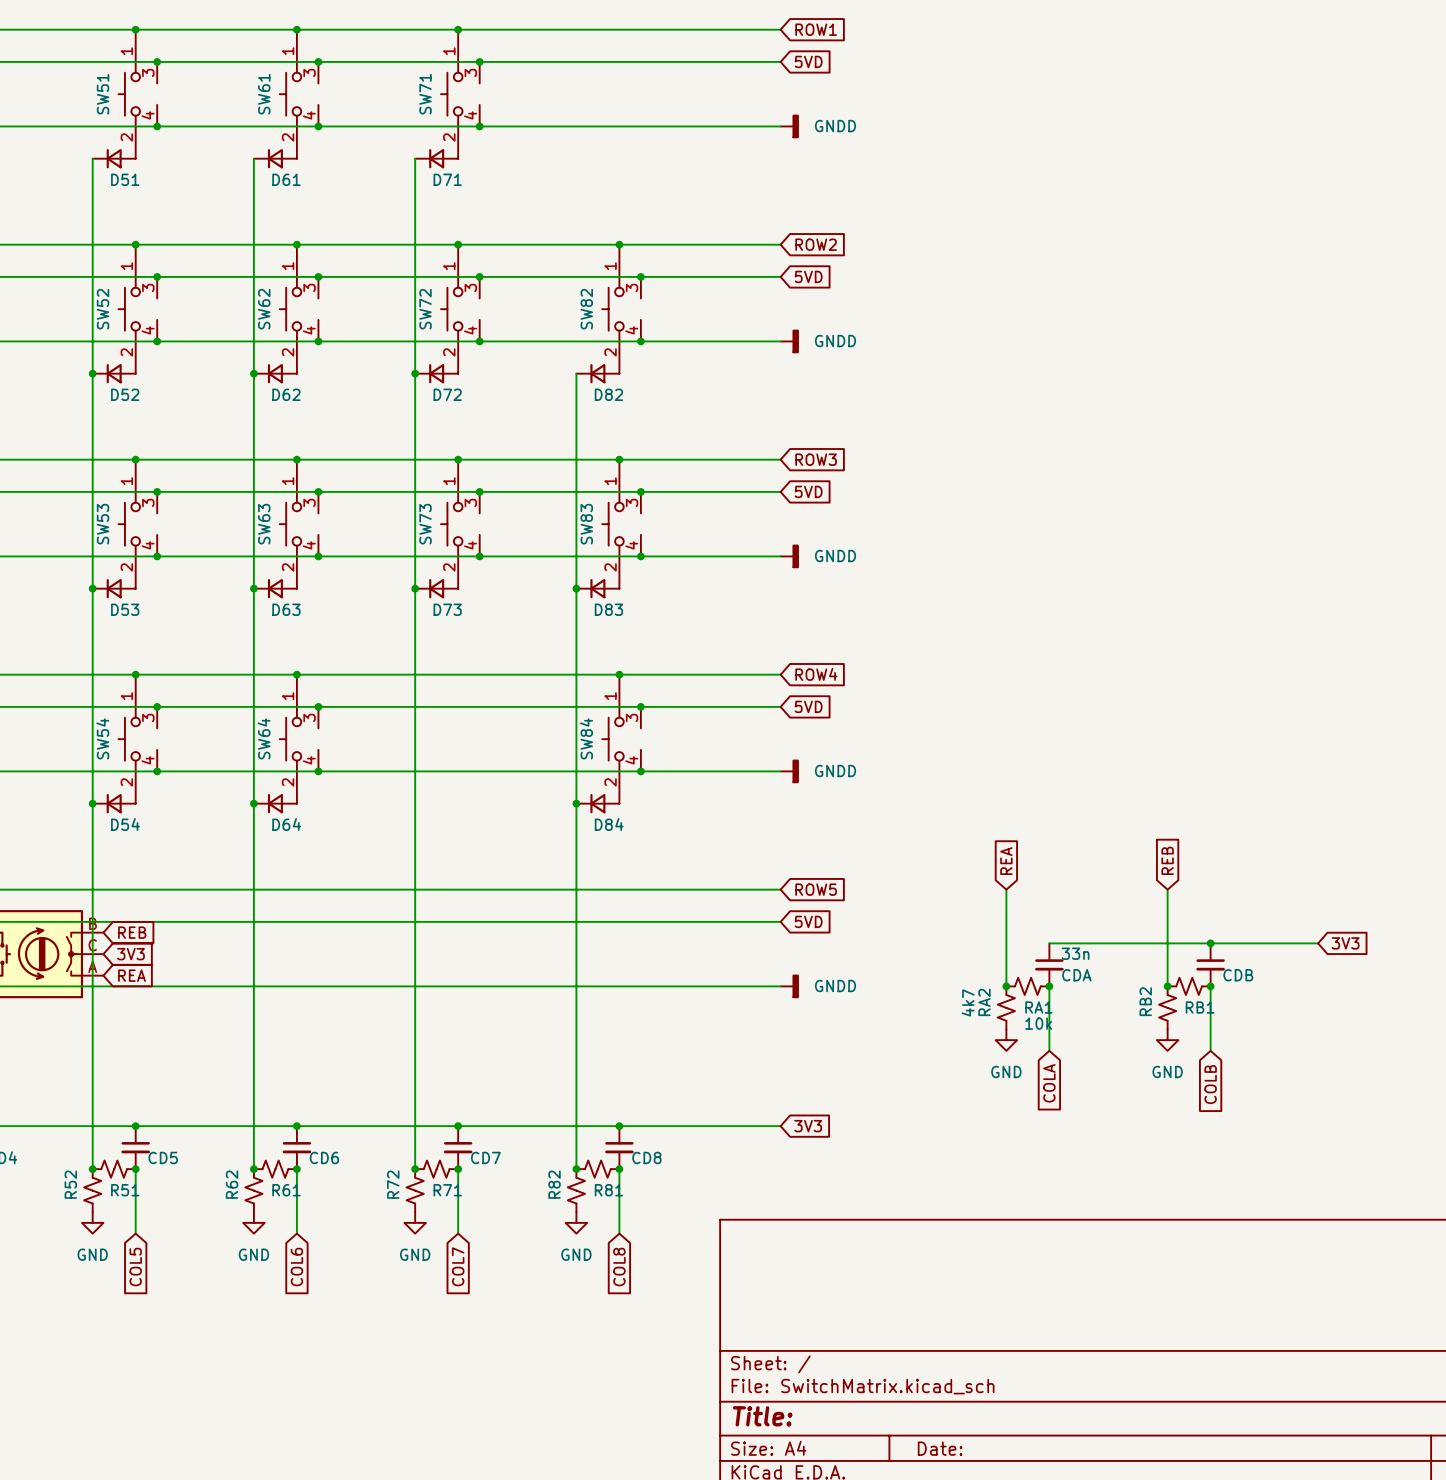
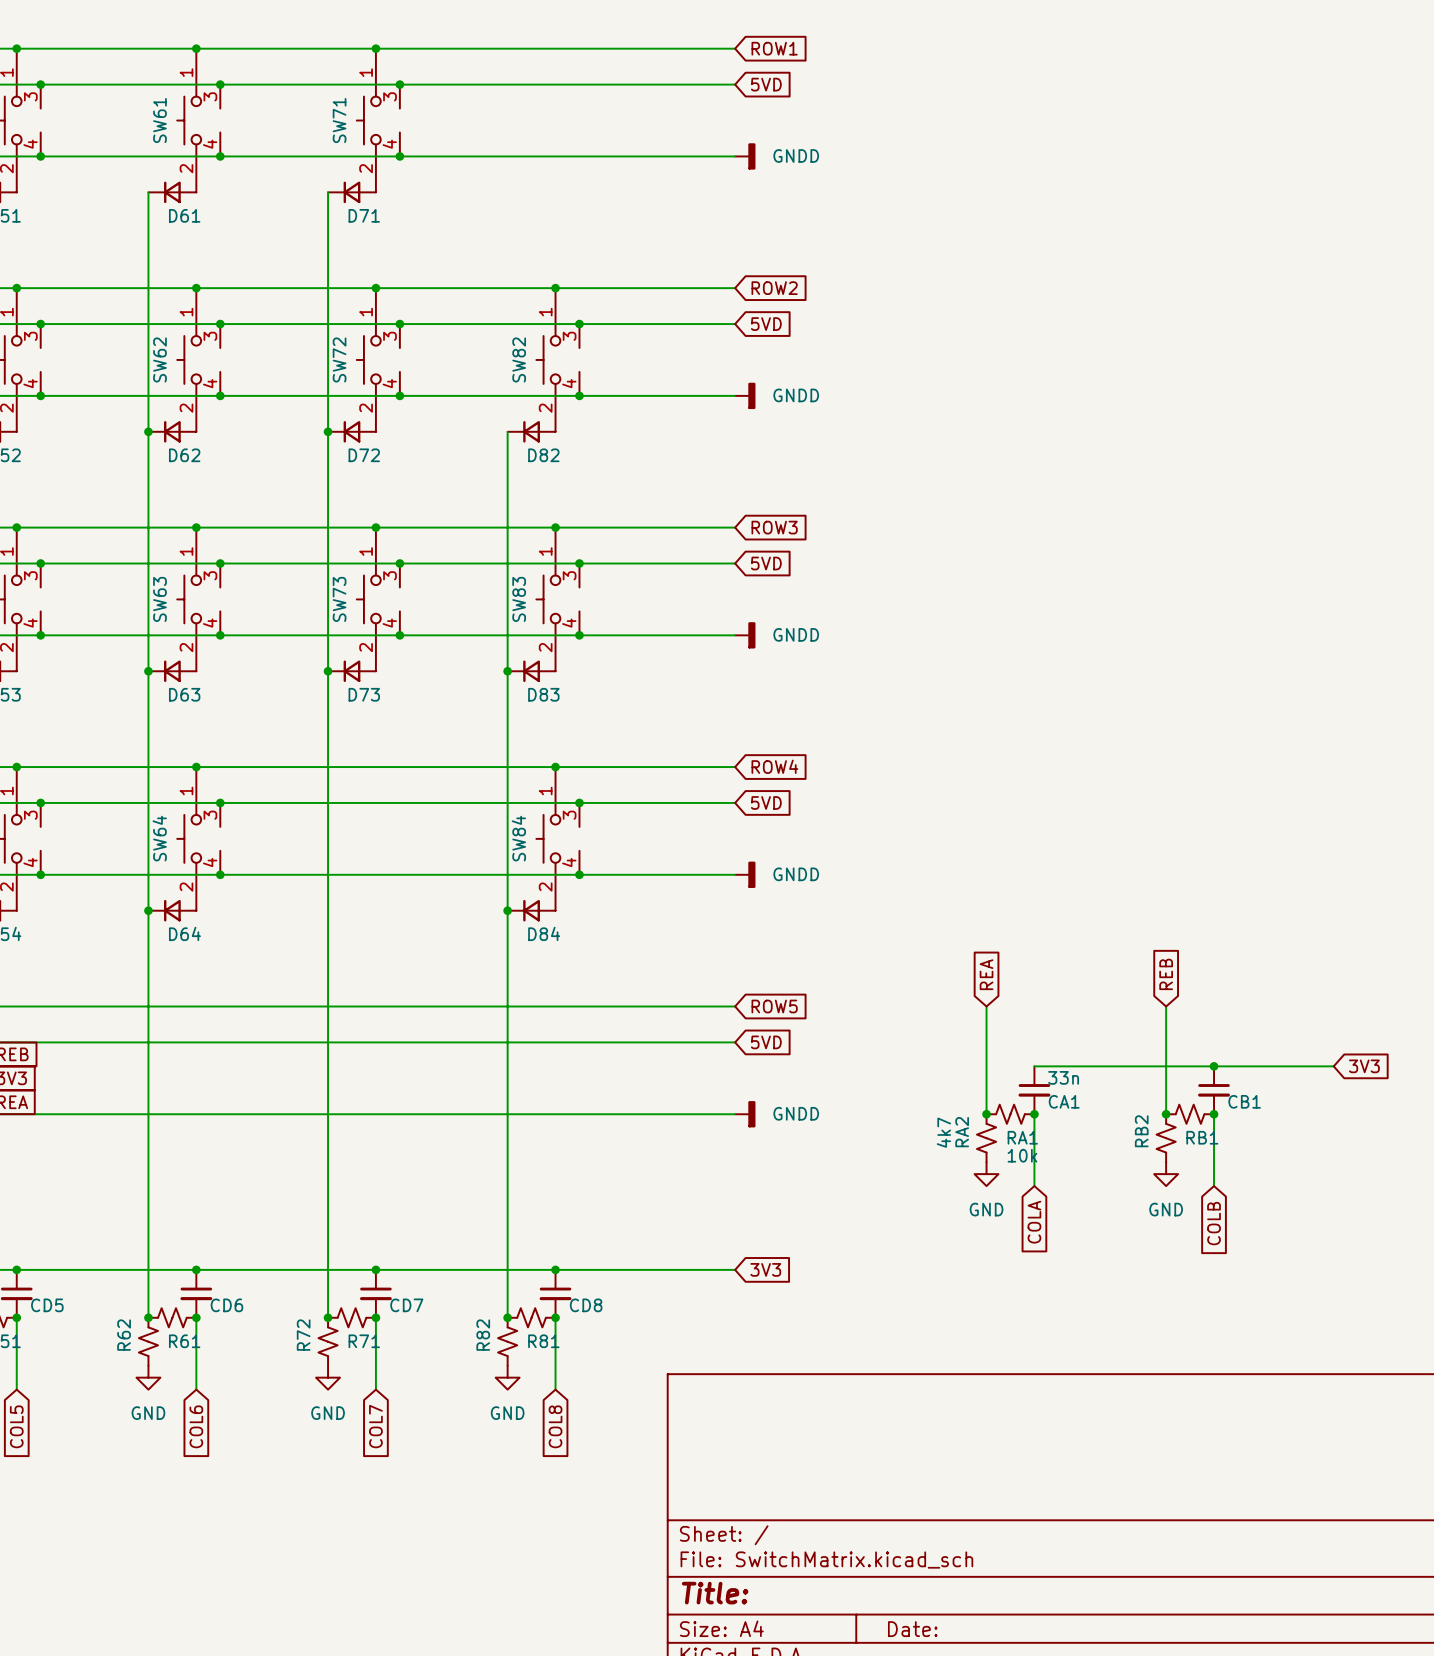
CDA name: CDA (1076, 975) -> CA1 (1064, 1101)
CDB name: CDB (1238, 975) -> CB1 (1244, 1101)

